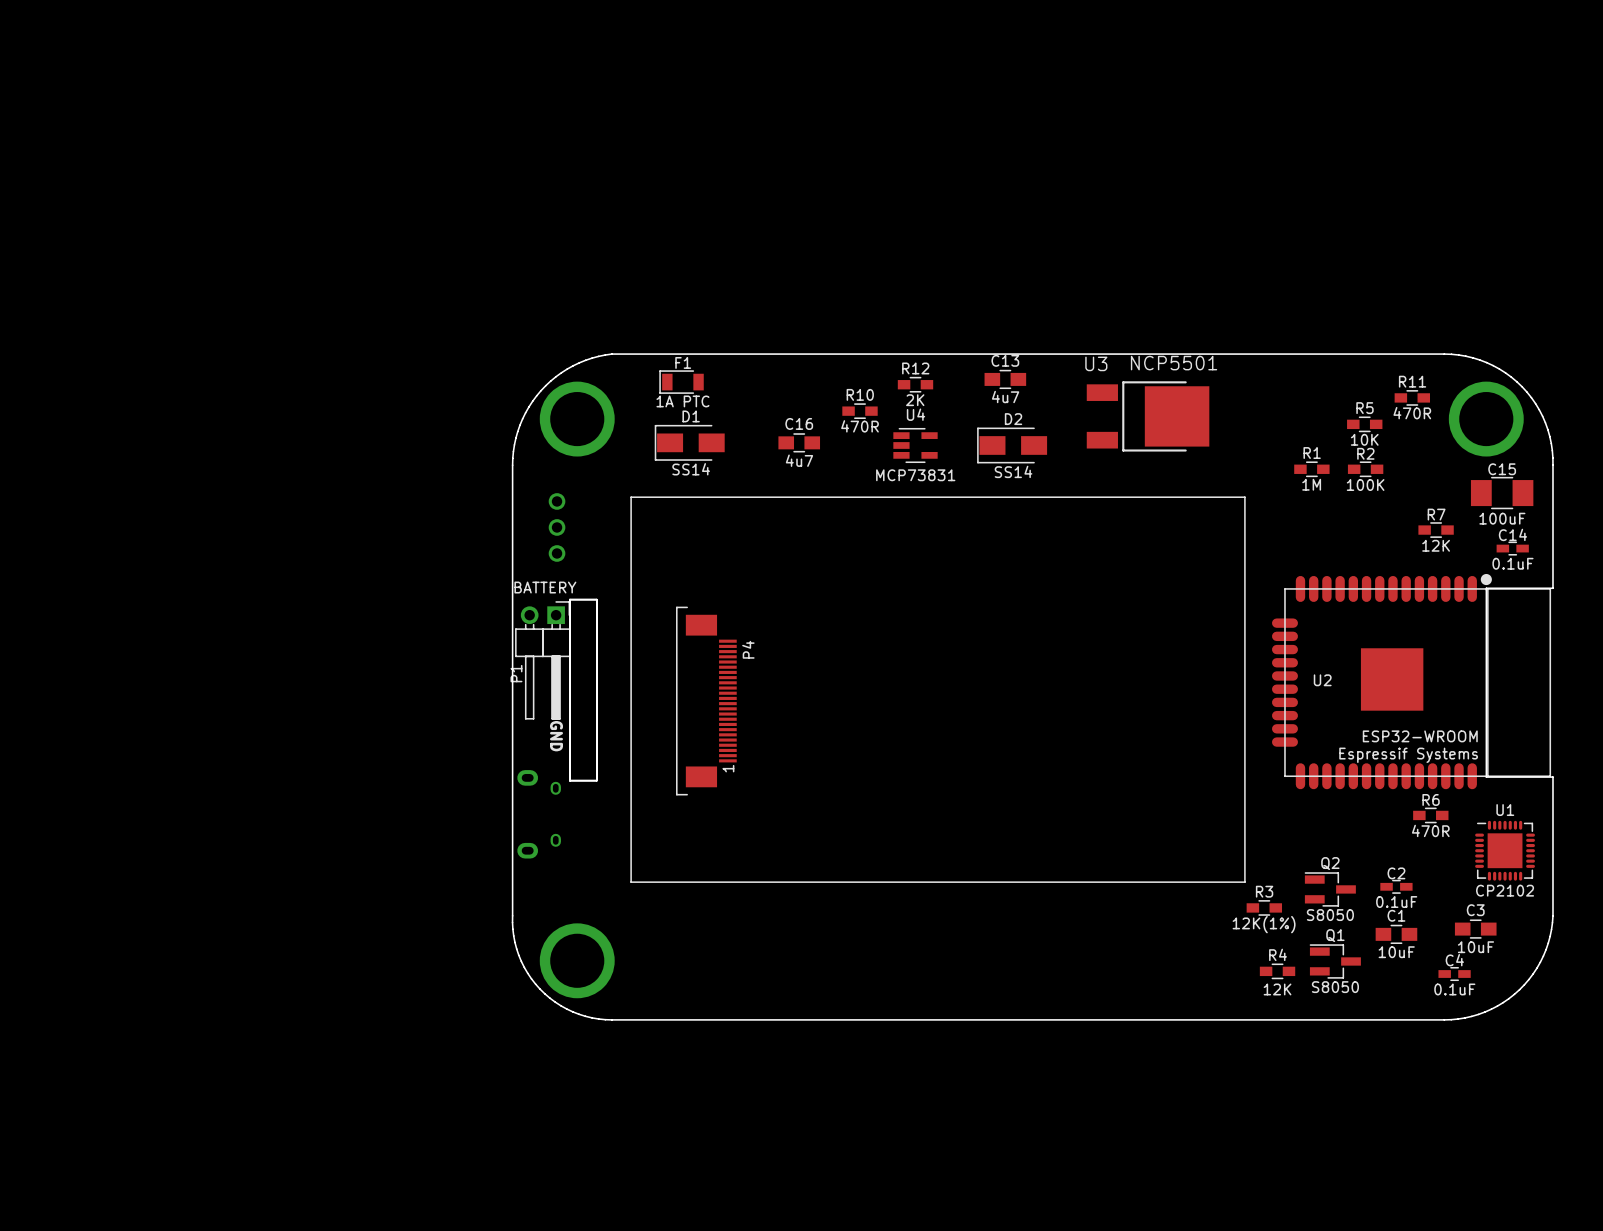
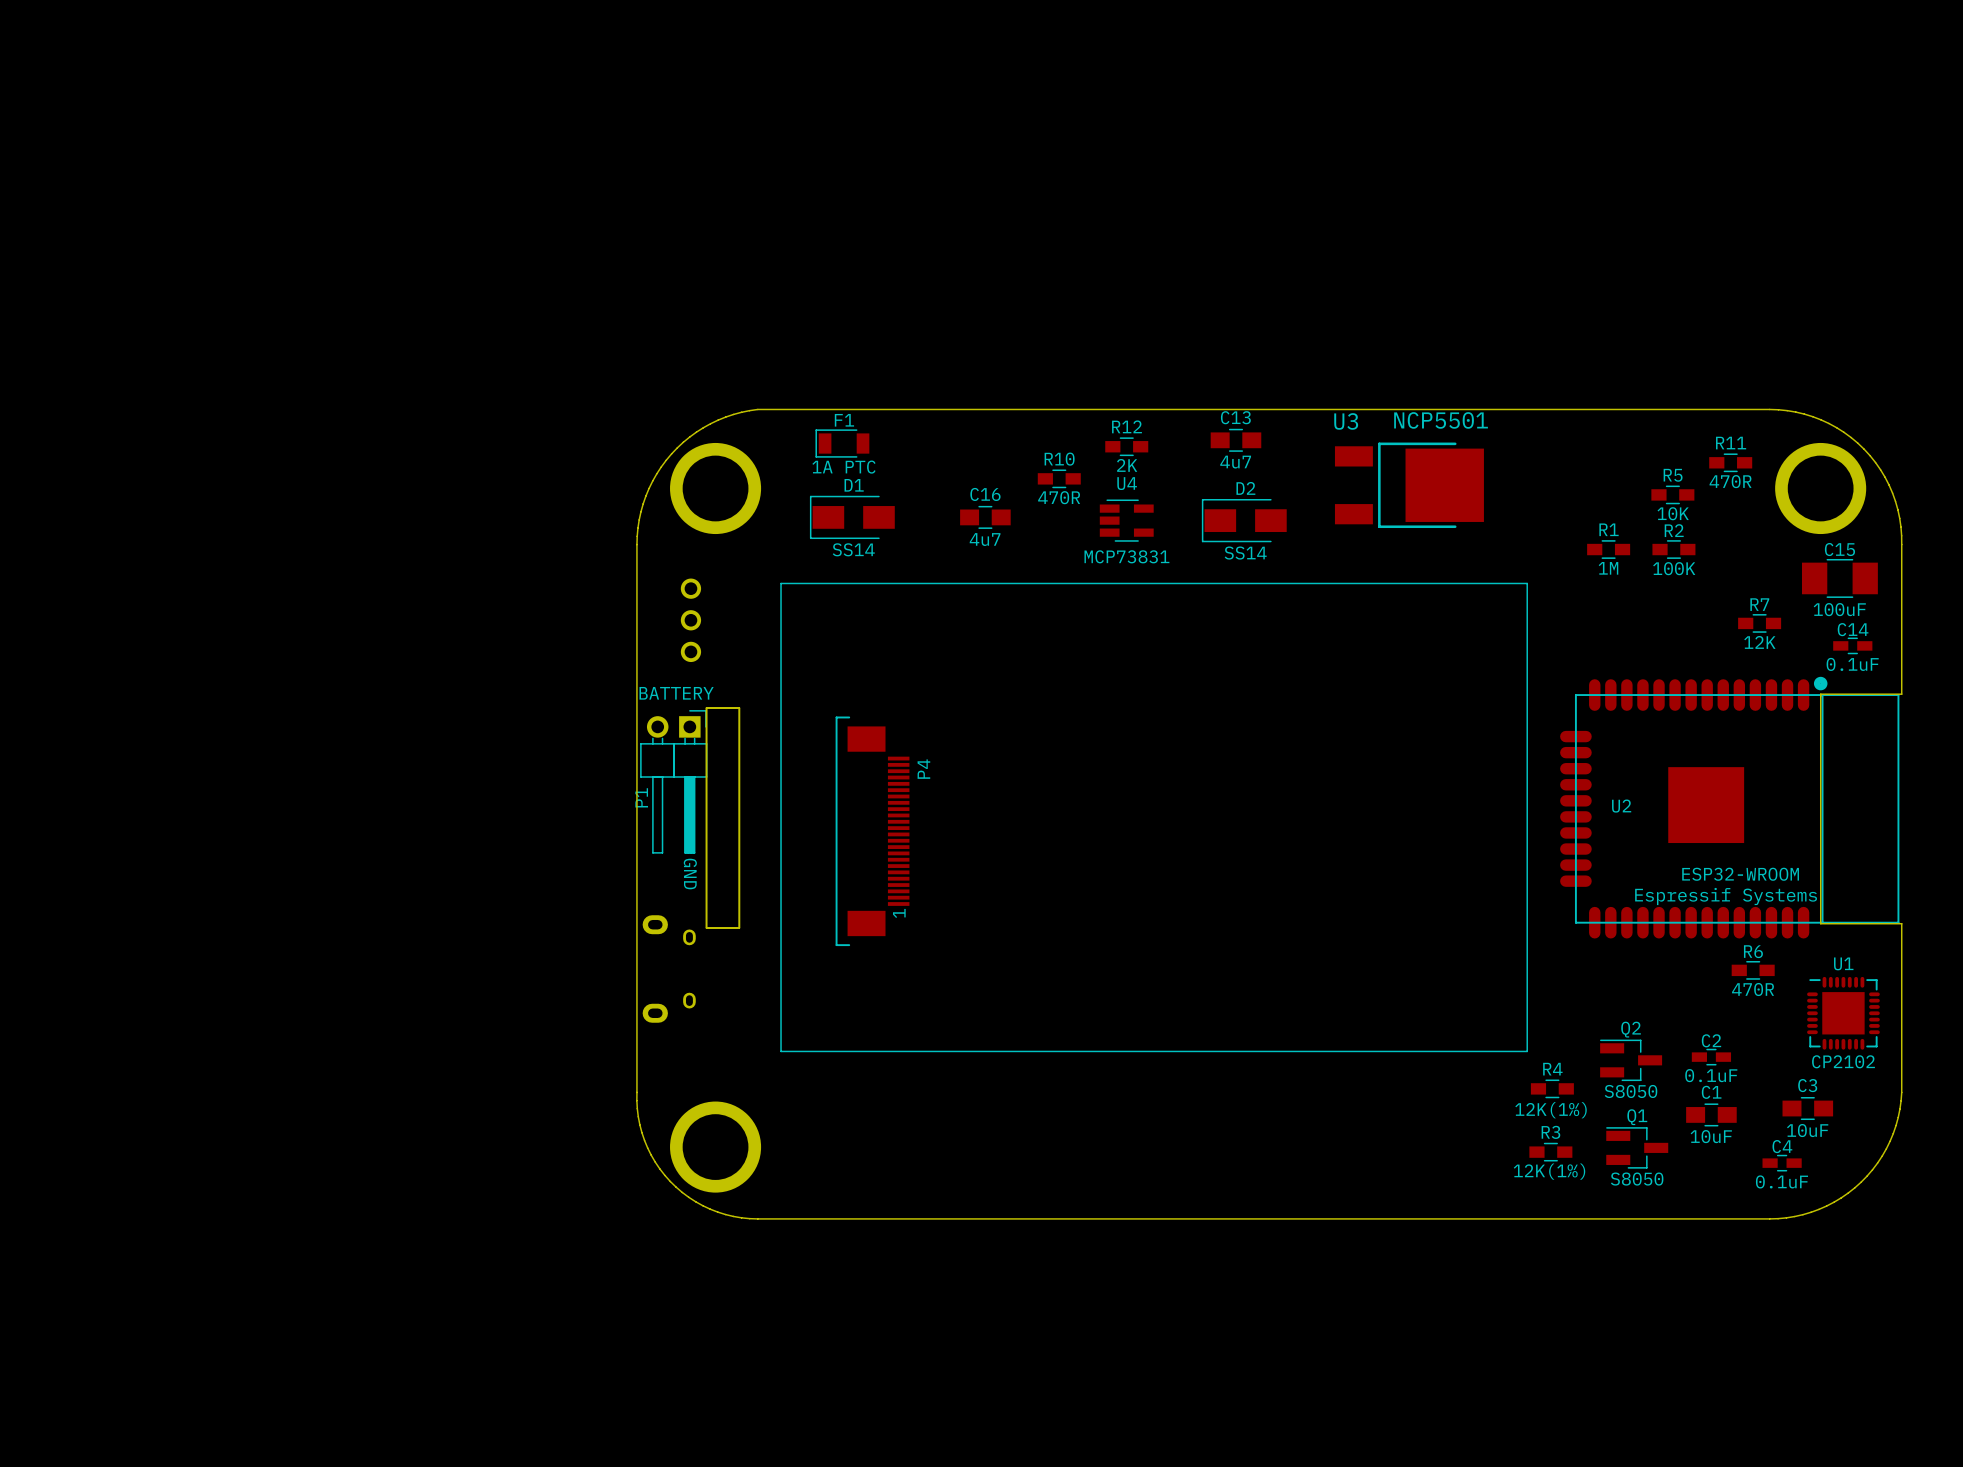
R3 position: (1264, 907) -> (1550, 1152)
R4 position: (1277, 971) -> (1552, 1088)
R4 value: 12K (1277, 989) -> 12K(1%) (1551, 1110)

